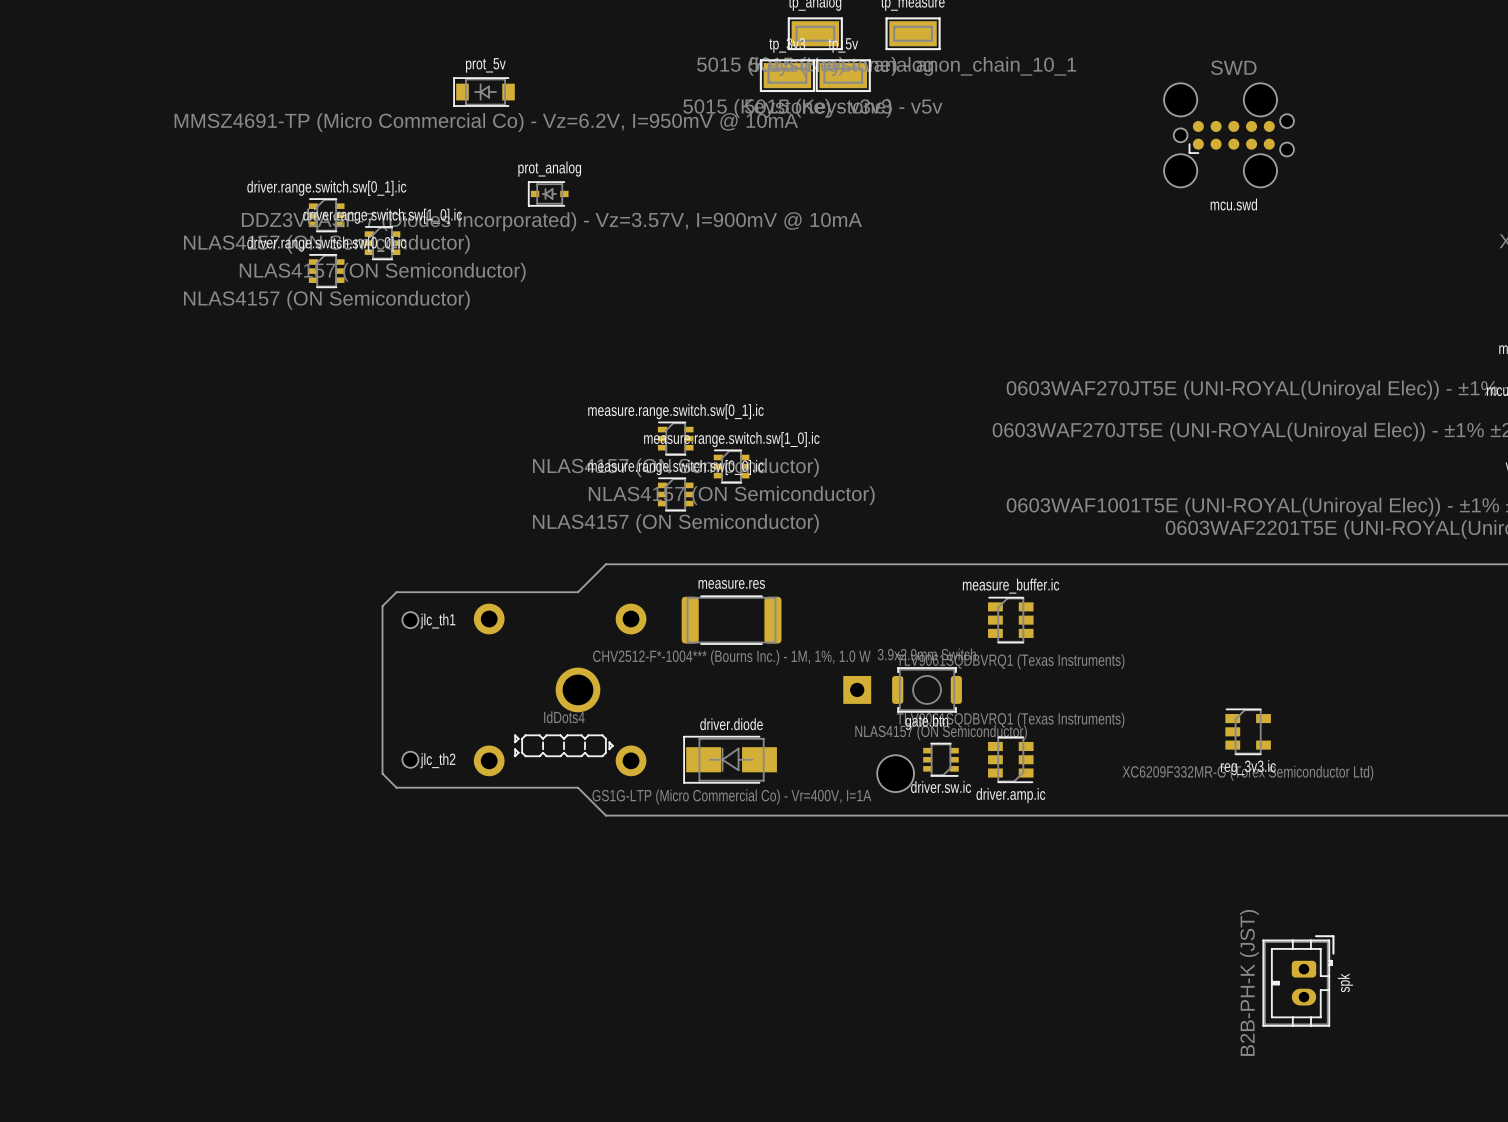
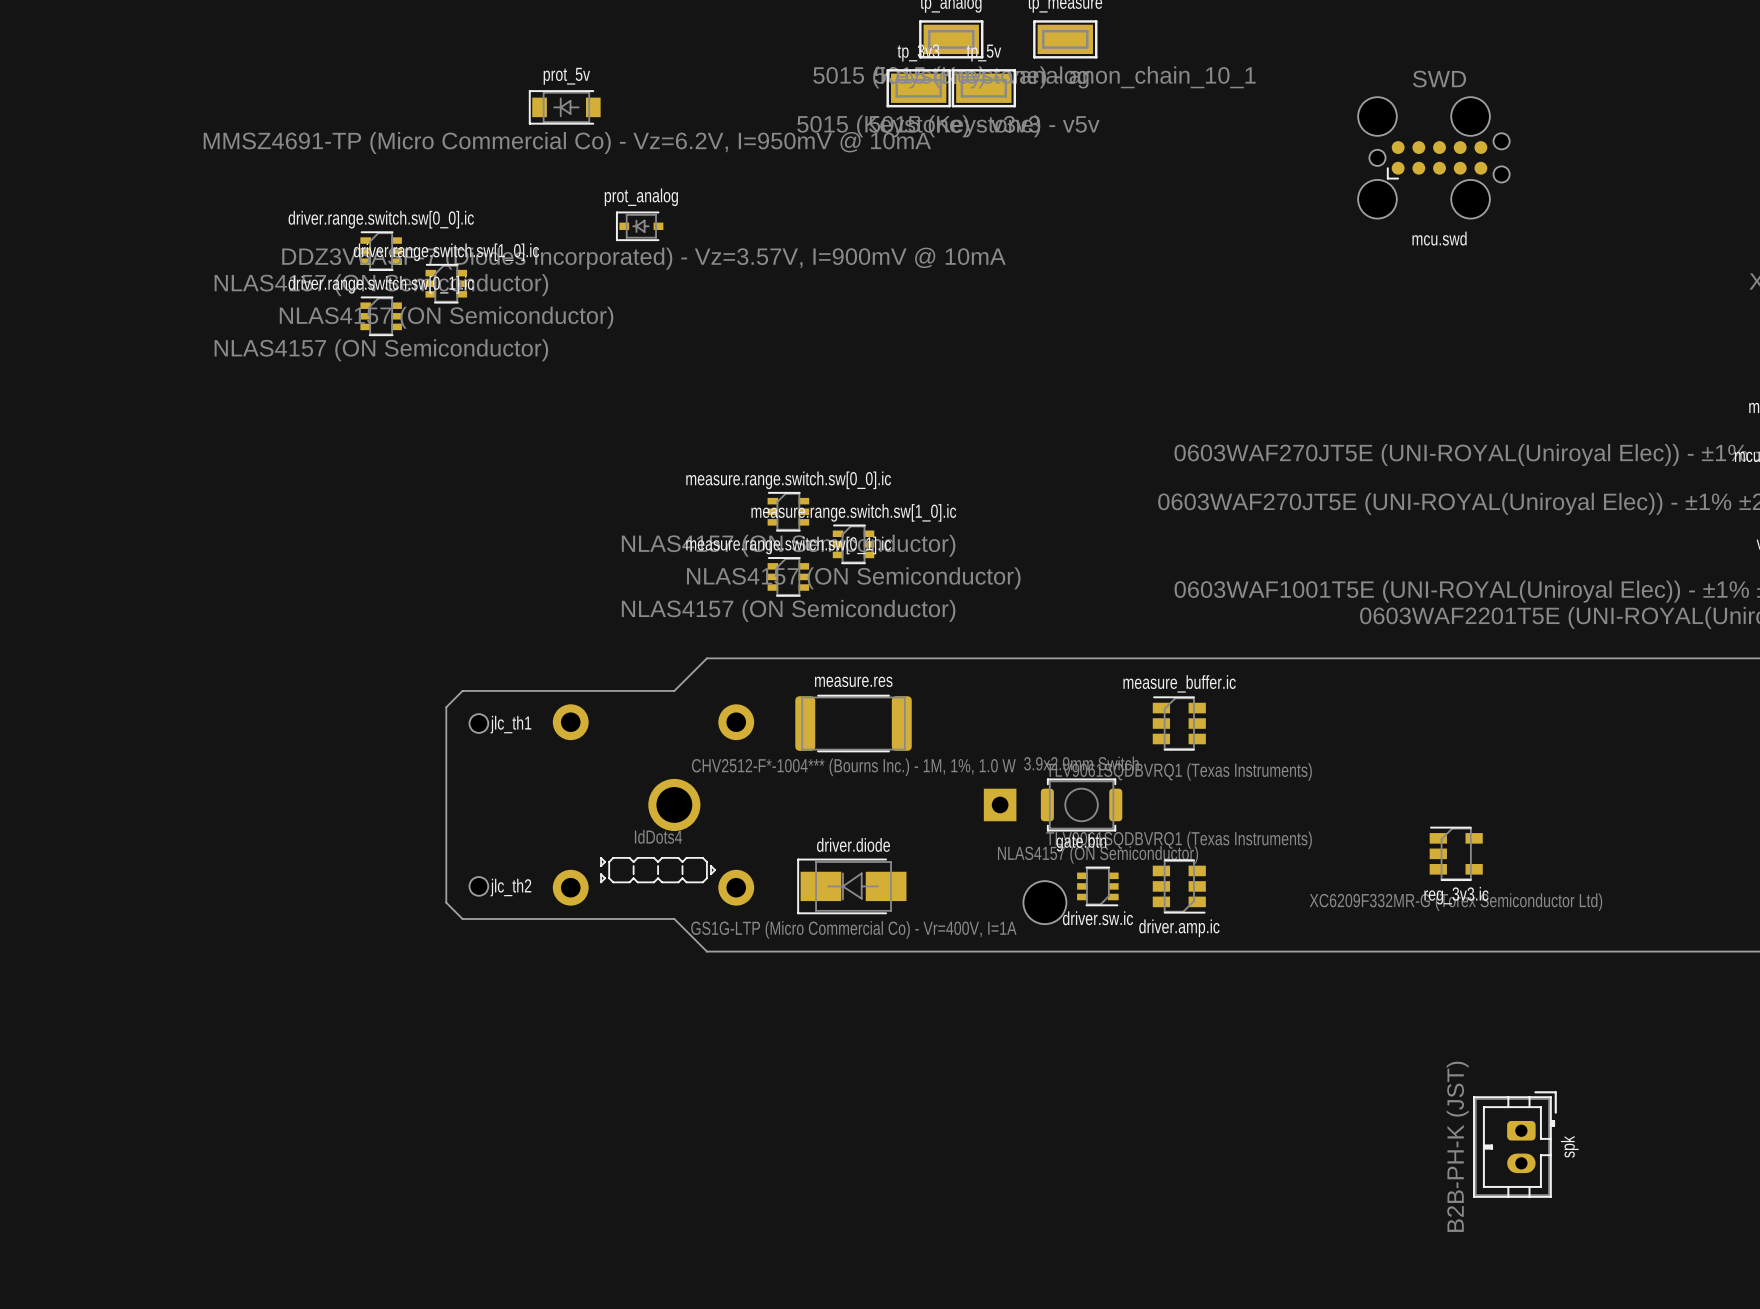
driver.range.switch.sw[0_1].ic name: driver.range.switch.sw[0_1].ic (326, 188) -> driver.range.switch.sw[0_0].ic (381, 219)
driver.range.switch.sw[0_0].ic name: driver.range.switch.sw[0_0].ic (326, 244) -> driver.range.switch.sw[0_1].ic (381, 284)
measure.range.switch.sw[0_1].ic name: measure.range.switch.sw[0_1].ic (675, 411) -> measure.range.switch.sw[0_0].ic (788, 480)
measure.range.switch.sw[0_0].ic name: measure.range.switch.sw[0_0].ic (675, 467) -> measure.range.switch.sw[0_1].ic (788, 545)

